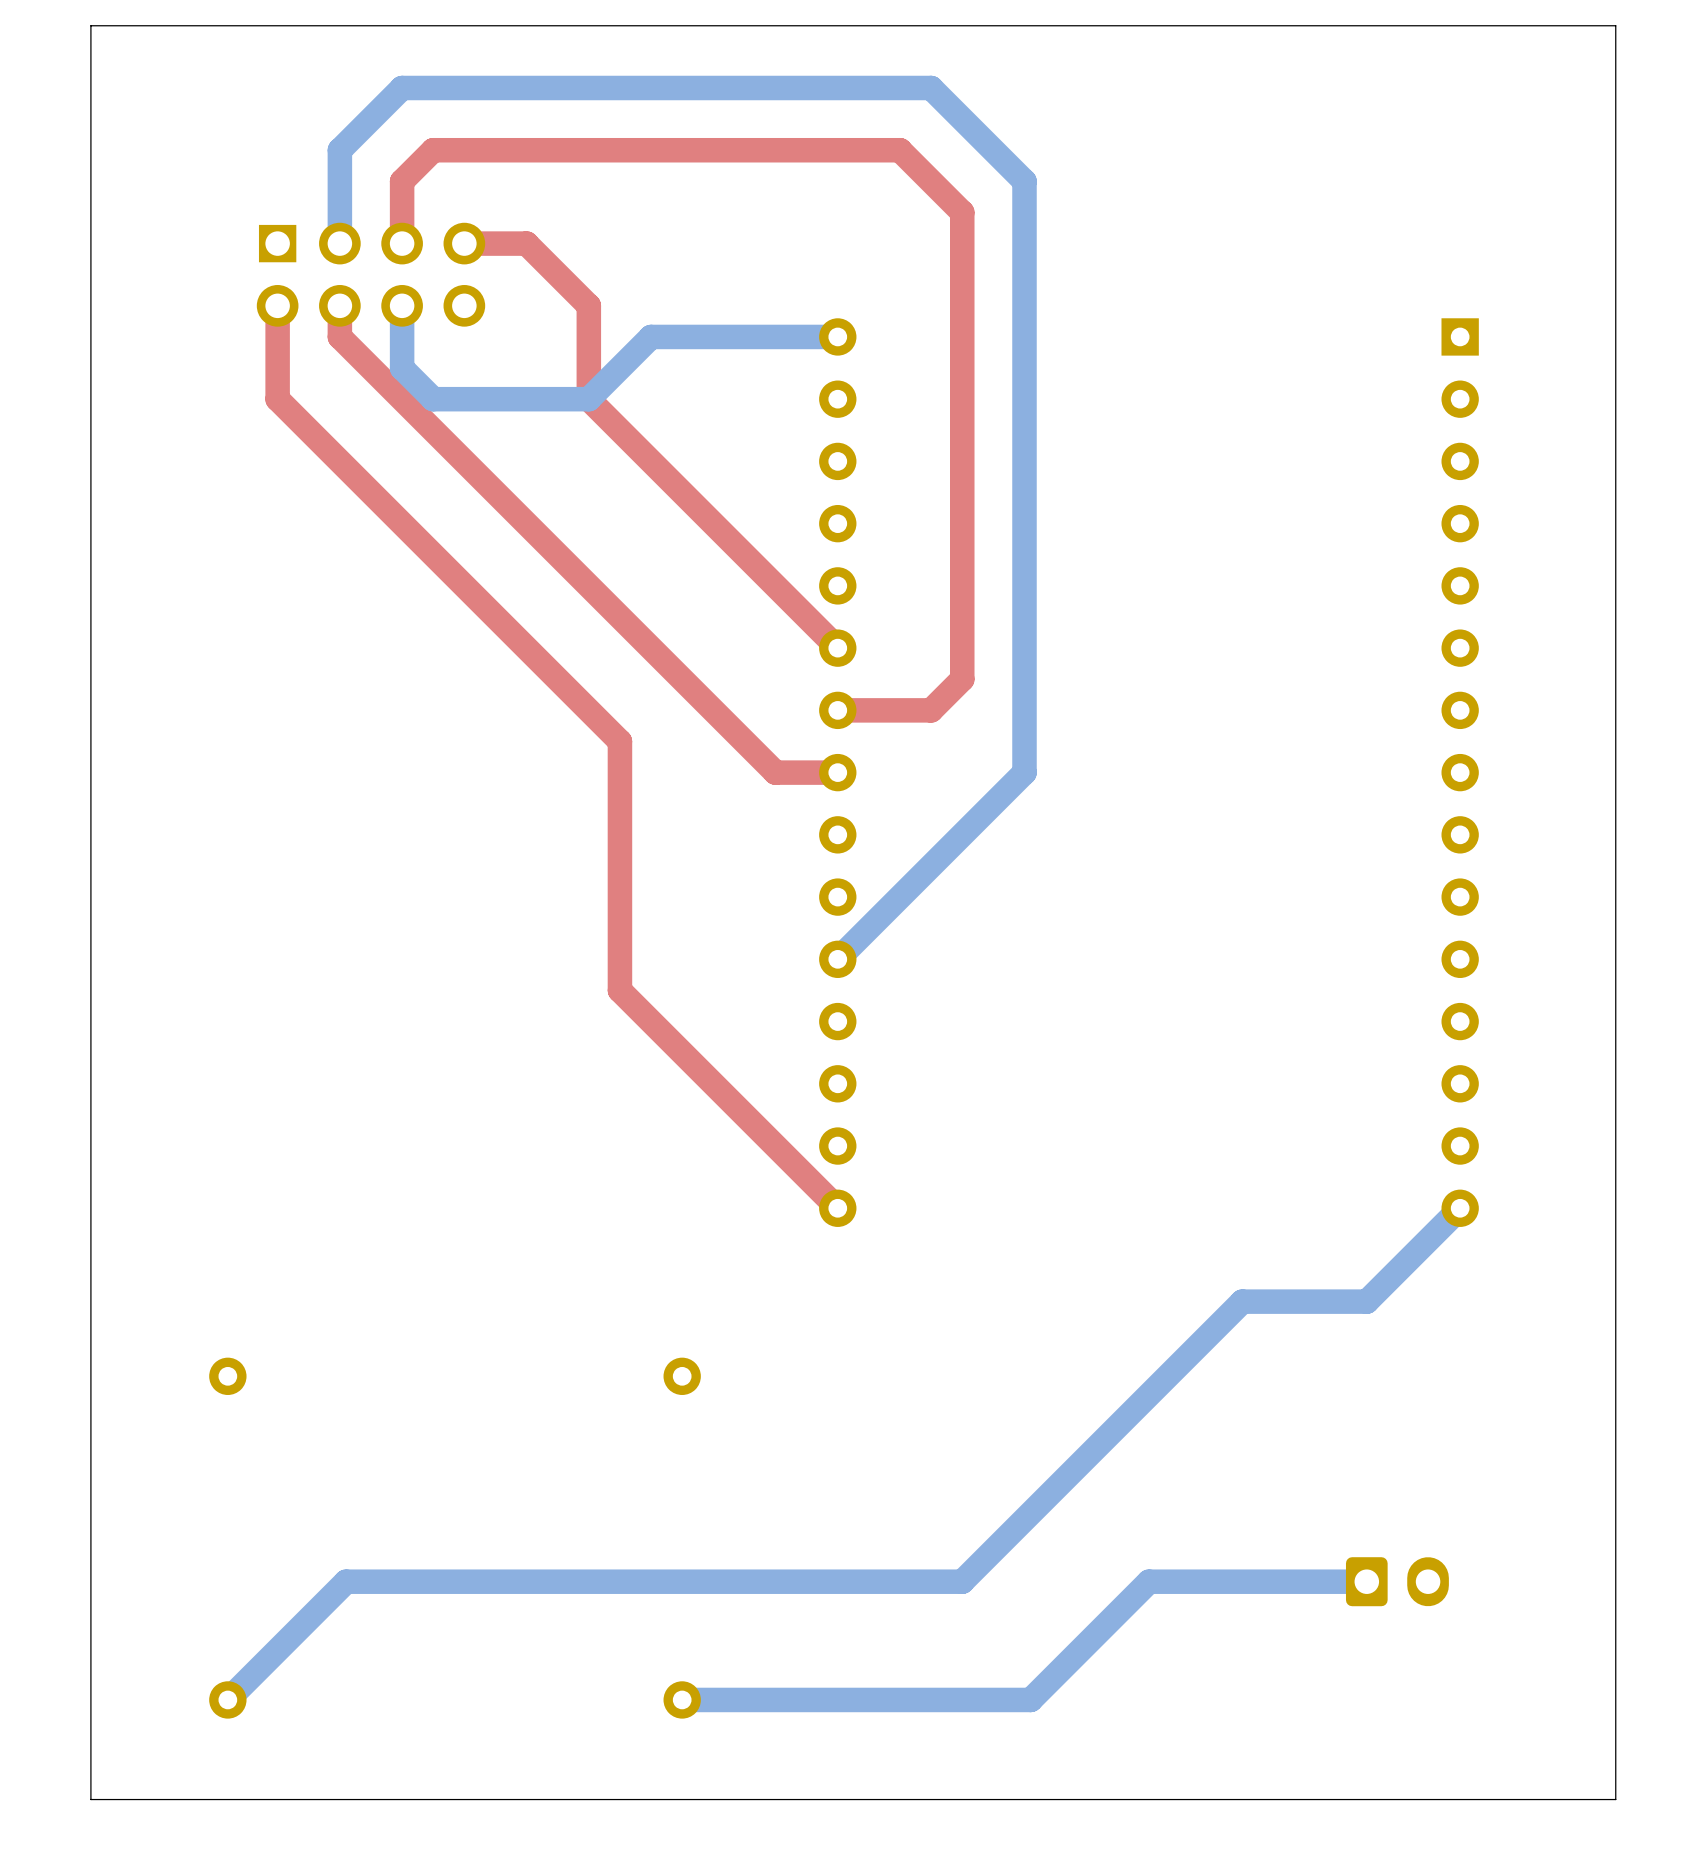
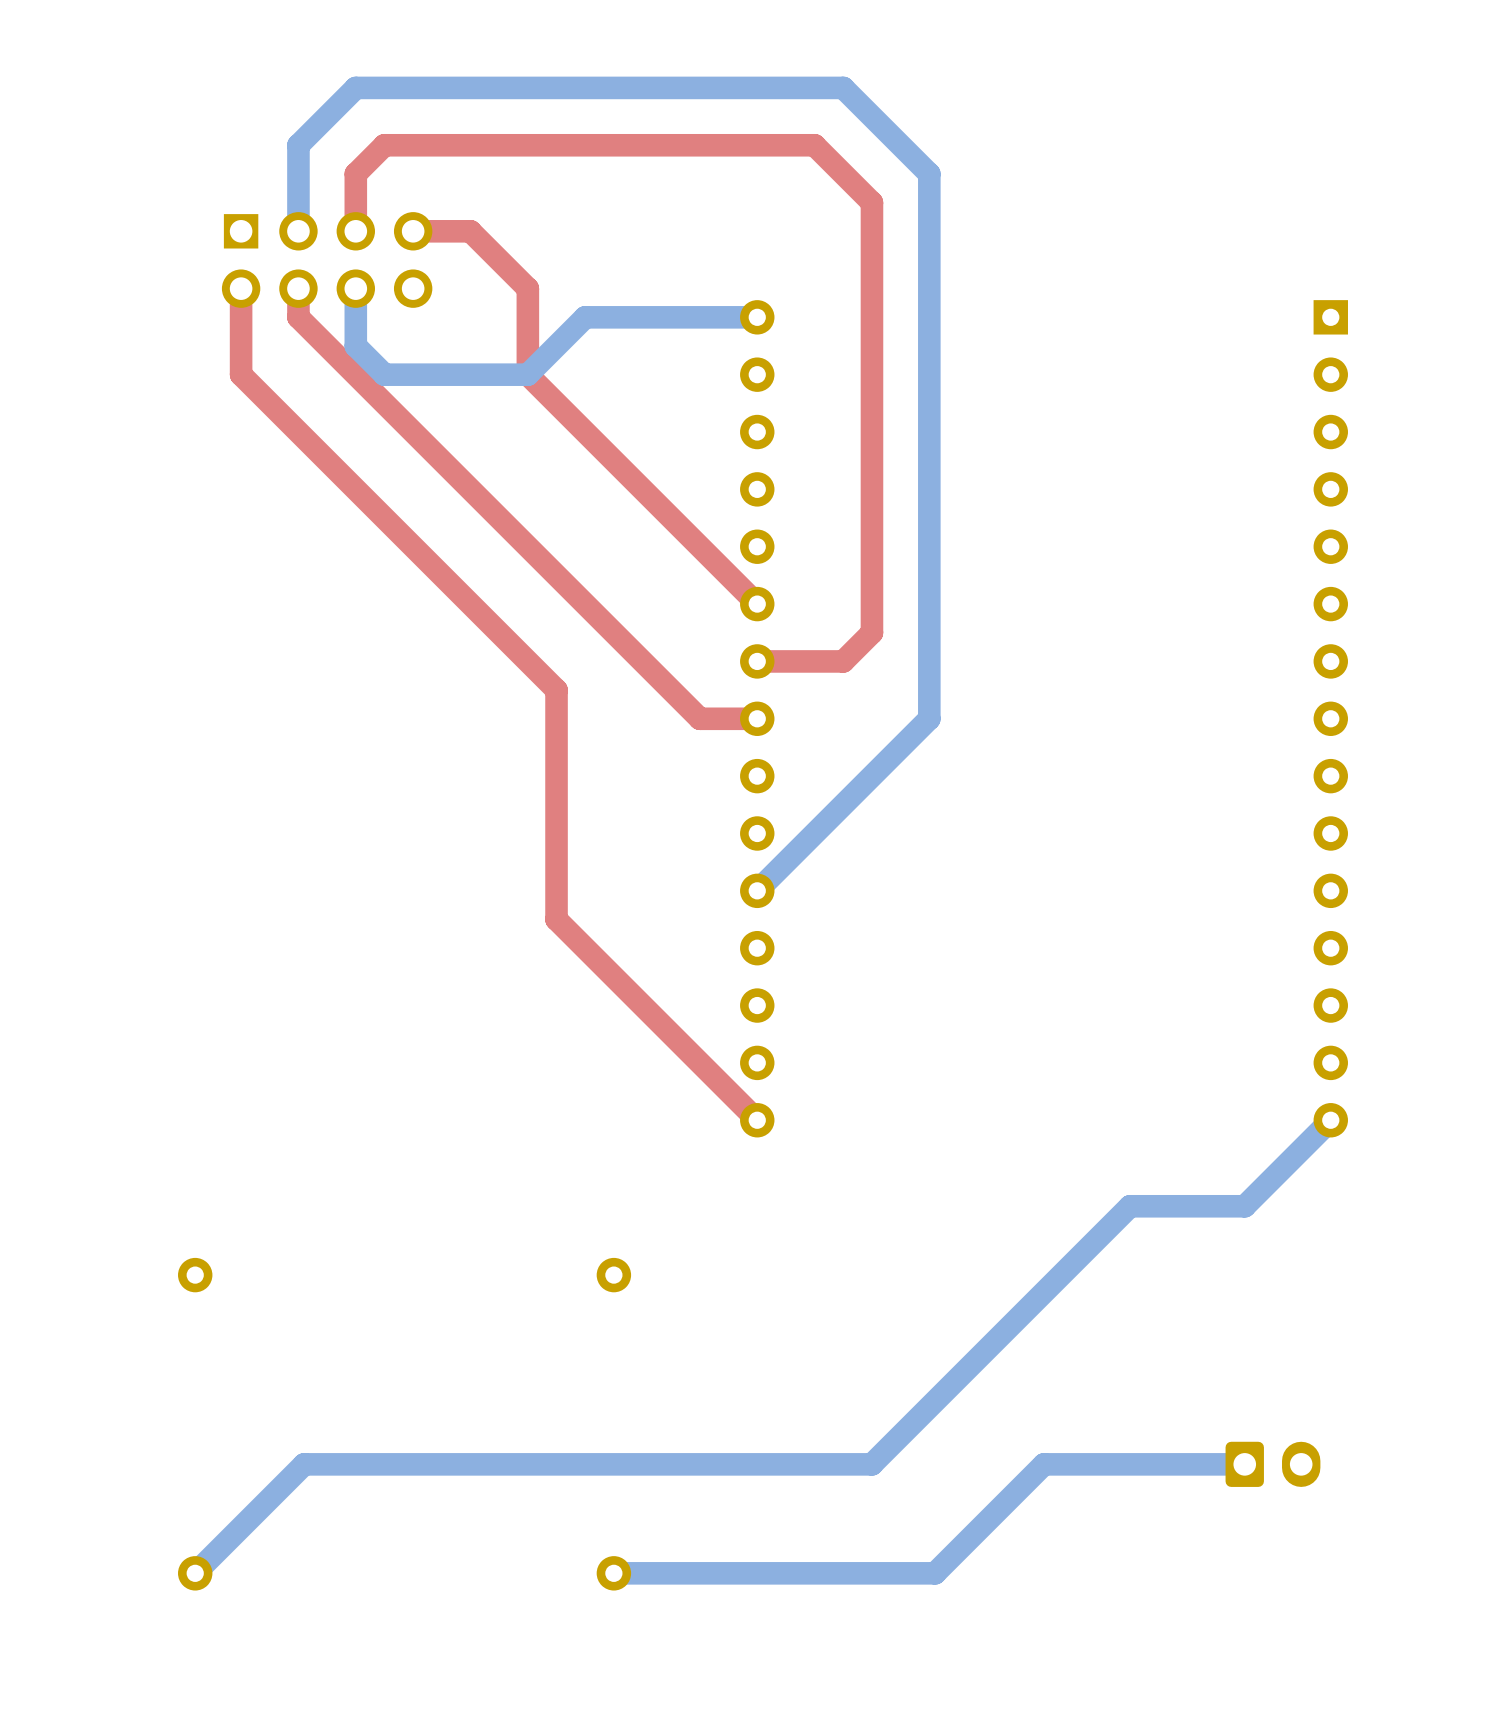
board edge: (1615, 25) (1615, 1799) (90, 1799) (90, 25) (1615, 25) -> none

